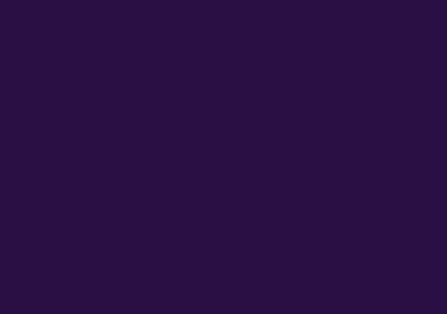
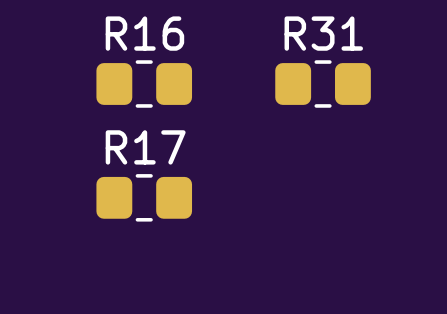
R16: none -> (144, 83)
R31: none -> (323, 83)
R17: none -> (144, 197)

